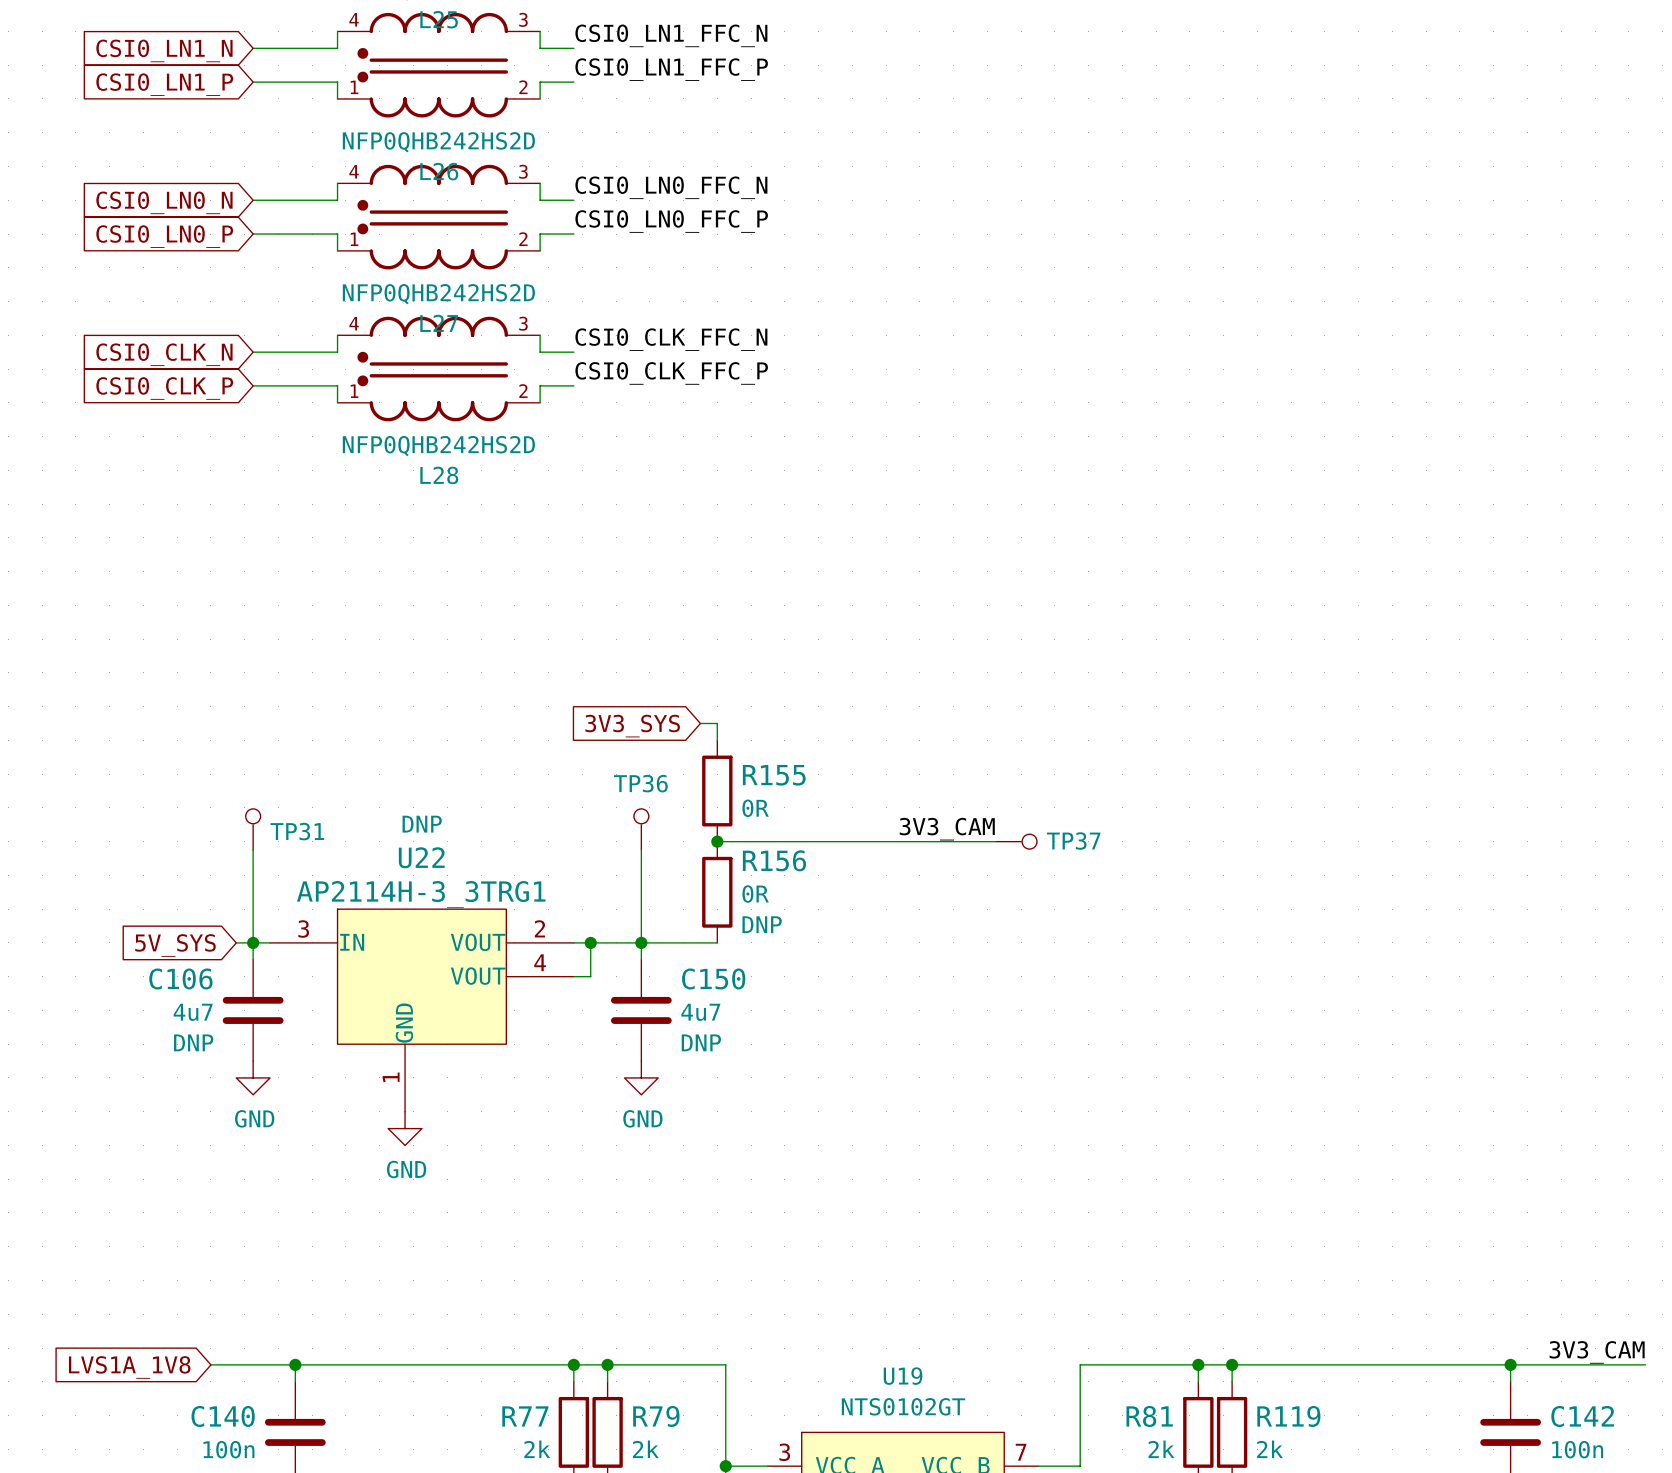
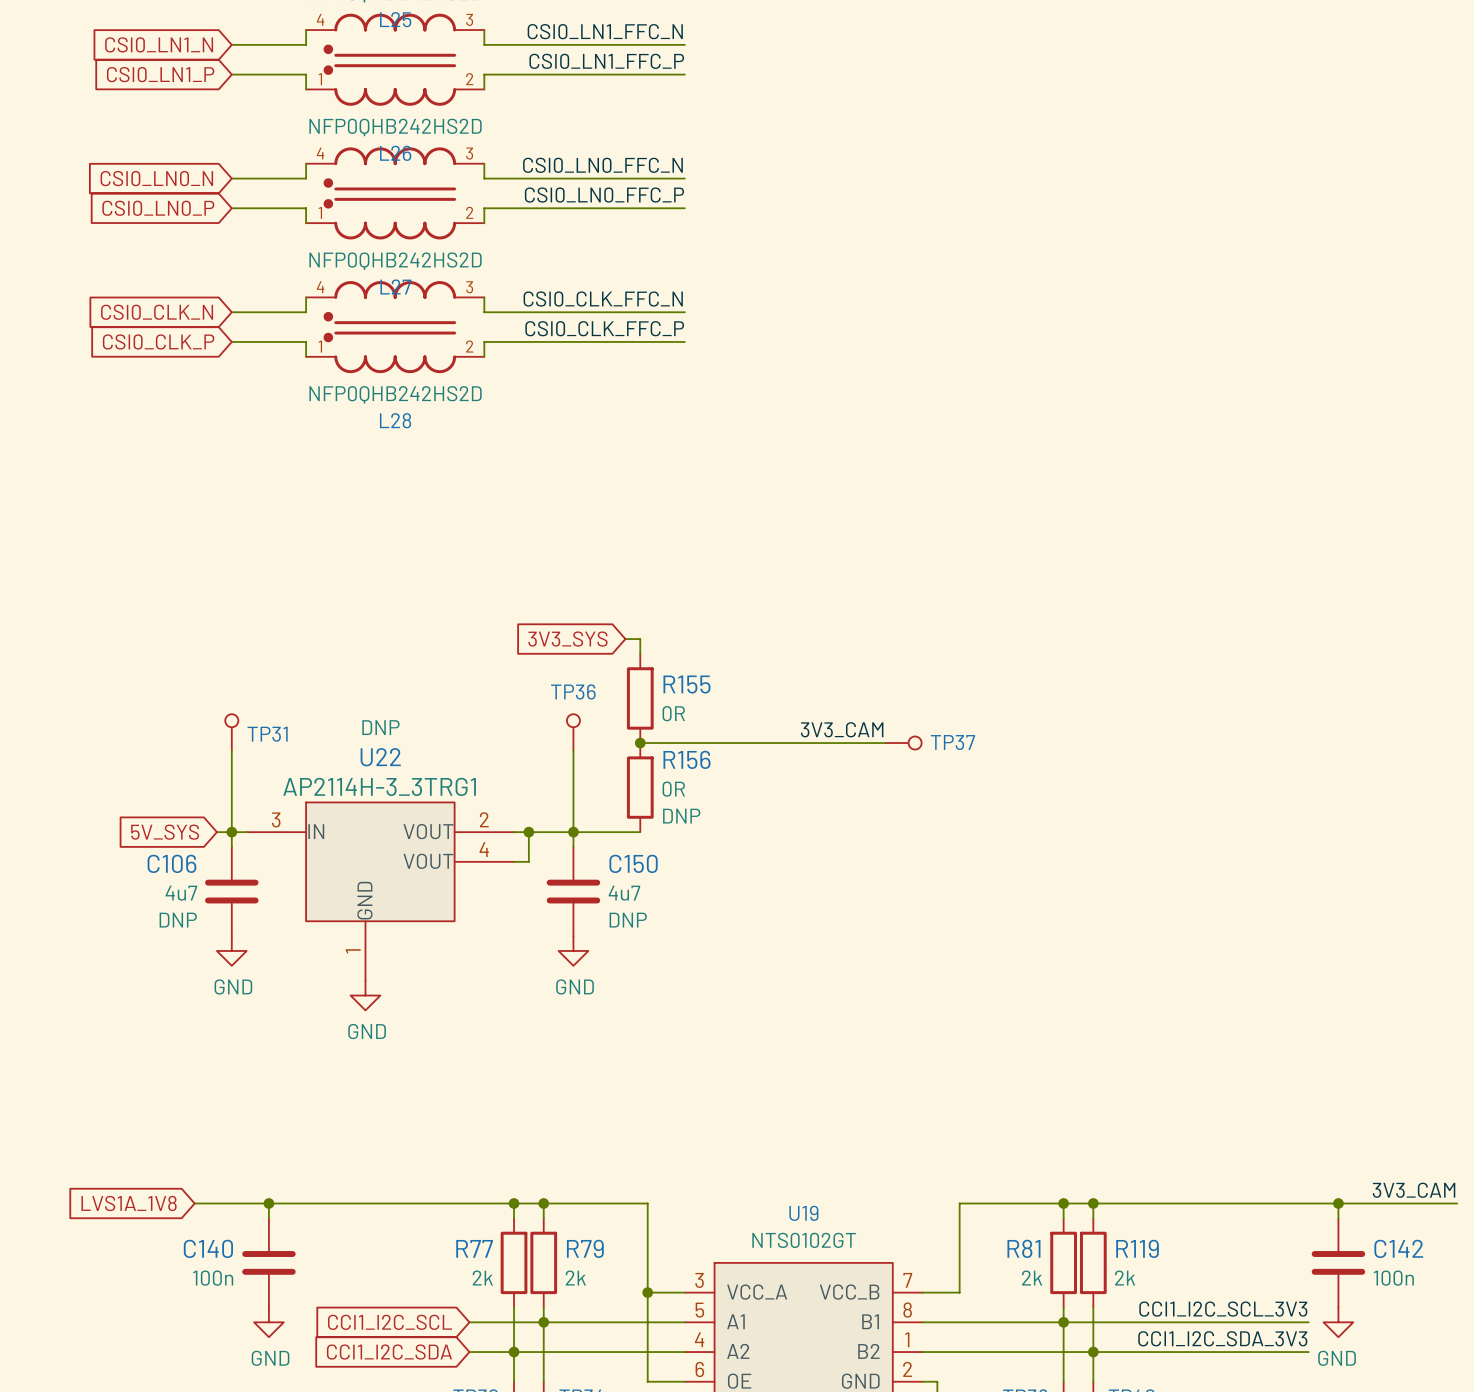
label position: CSI0_LN1_FFC_N (671, 35) -> CSI0_LN1_FFC_N (605, 31)
wire: none -> (514, 44) (684, 44)
label position: CSI0_LN1_FFC_P (671, 69) -> CSI0_LN1_FFC_P (606, 61)
wire: none -> (514, 74) (684, 74)
label position: CSI0_LN0_FFC_N (671, 187) -> CSI0_LN0_FFC_N (602, 165)
wire: none -> (514, 178) (684, 178)
label position: CSI0_LN0_FFC_P (671, 221) -> CSI0_LN0_FFC_P (604, 195)
wire: none -> (514, 208) (684, 208)
label position: CSI0_CLK_FFC_N (671, 339) -> CSI0_CLK_FFC_N (603, 299)
wire: none -> (514, 312) (684, 312)
label position: CSI0_CLK_FFC_P (671, 373) -> CSI0_CLK_FFC_P (604, 328)
wire: none -> (514, 341) (684, 341)

